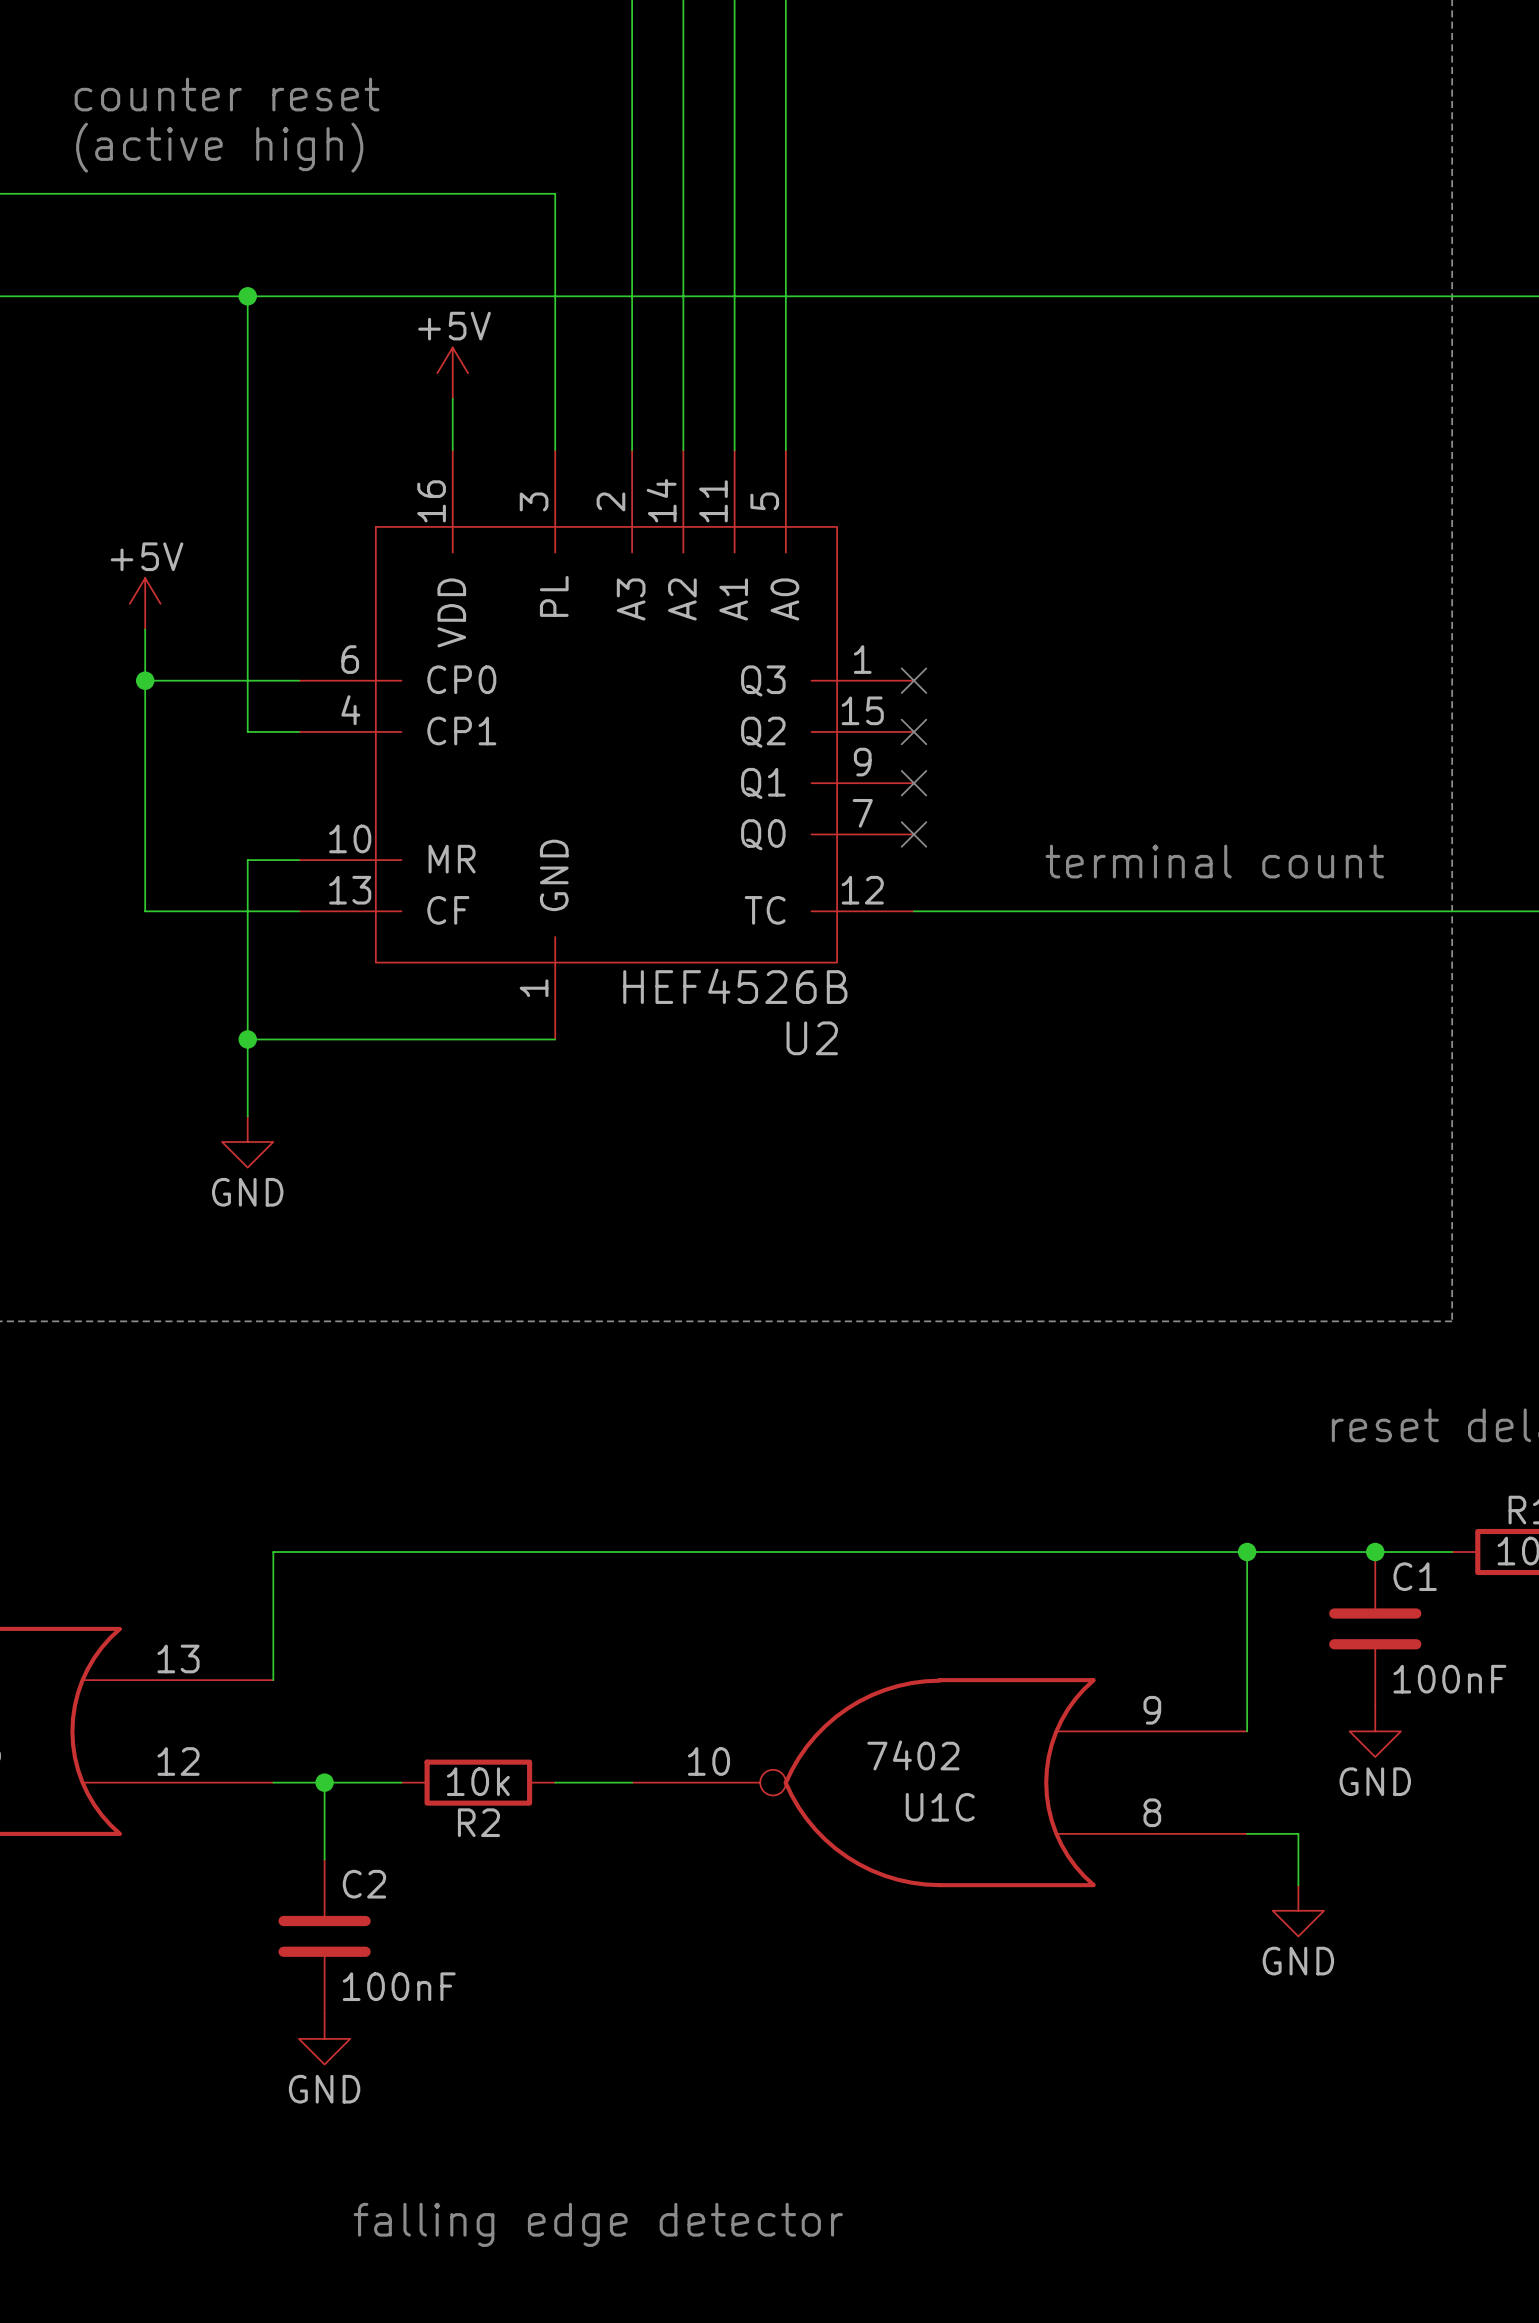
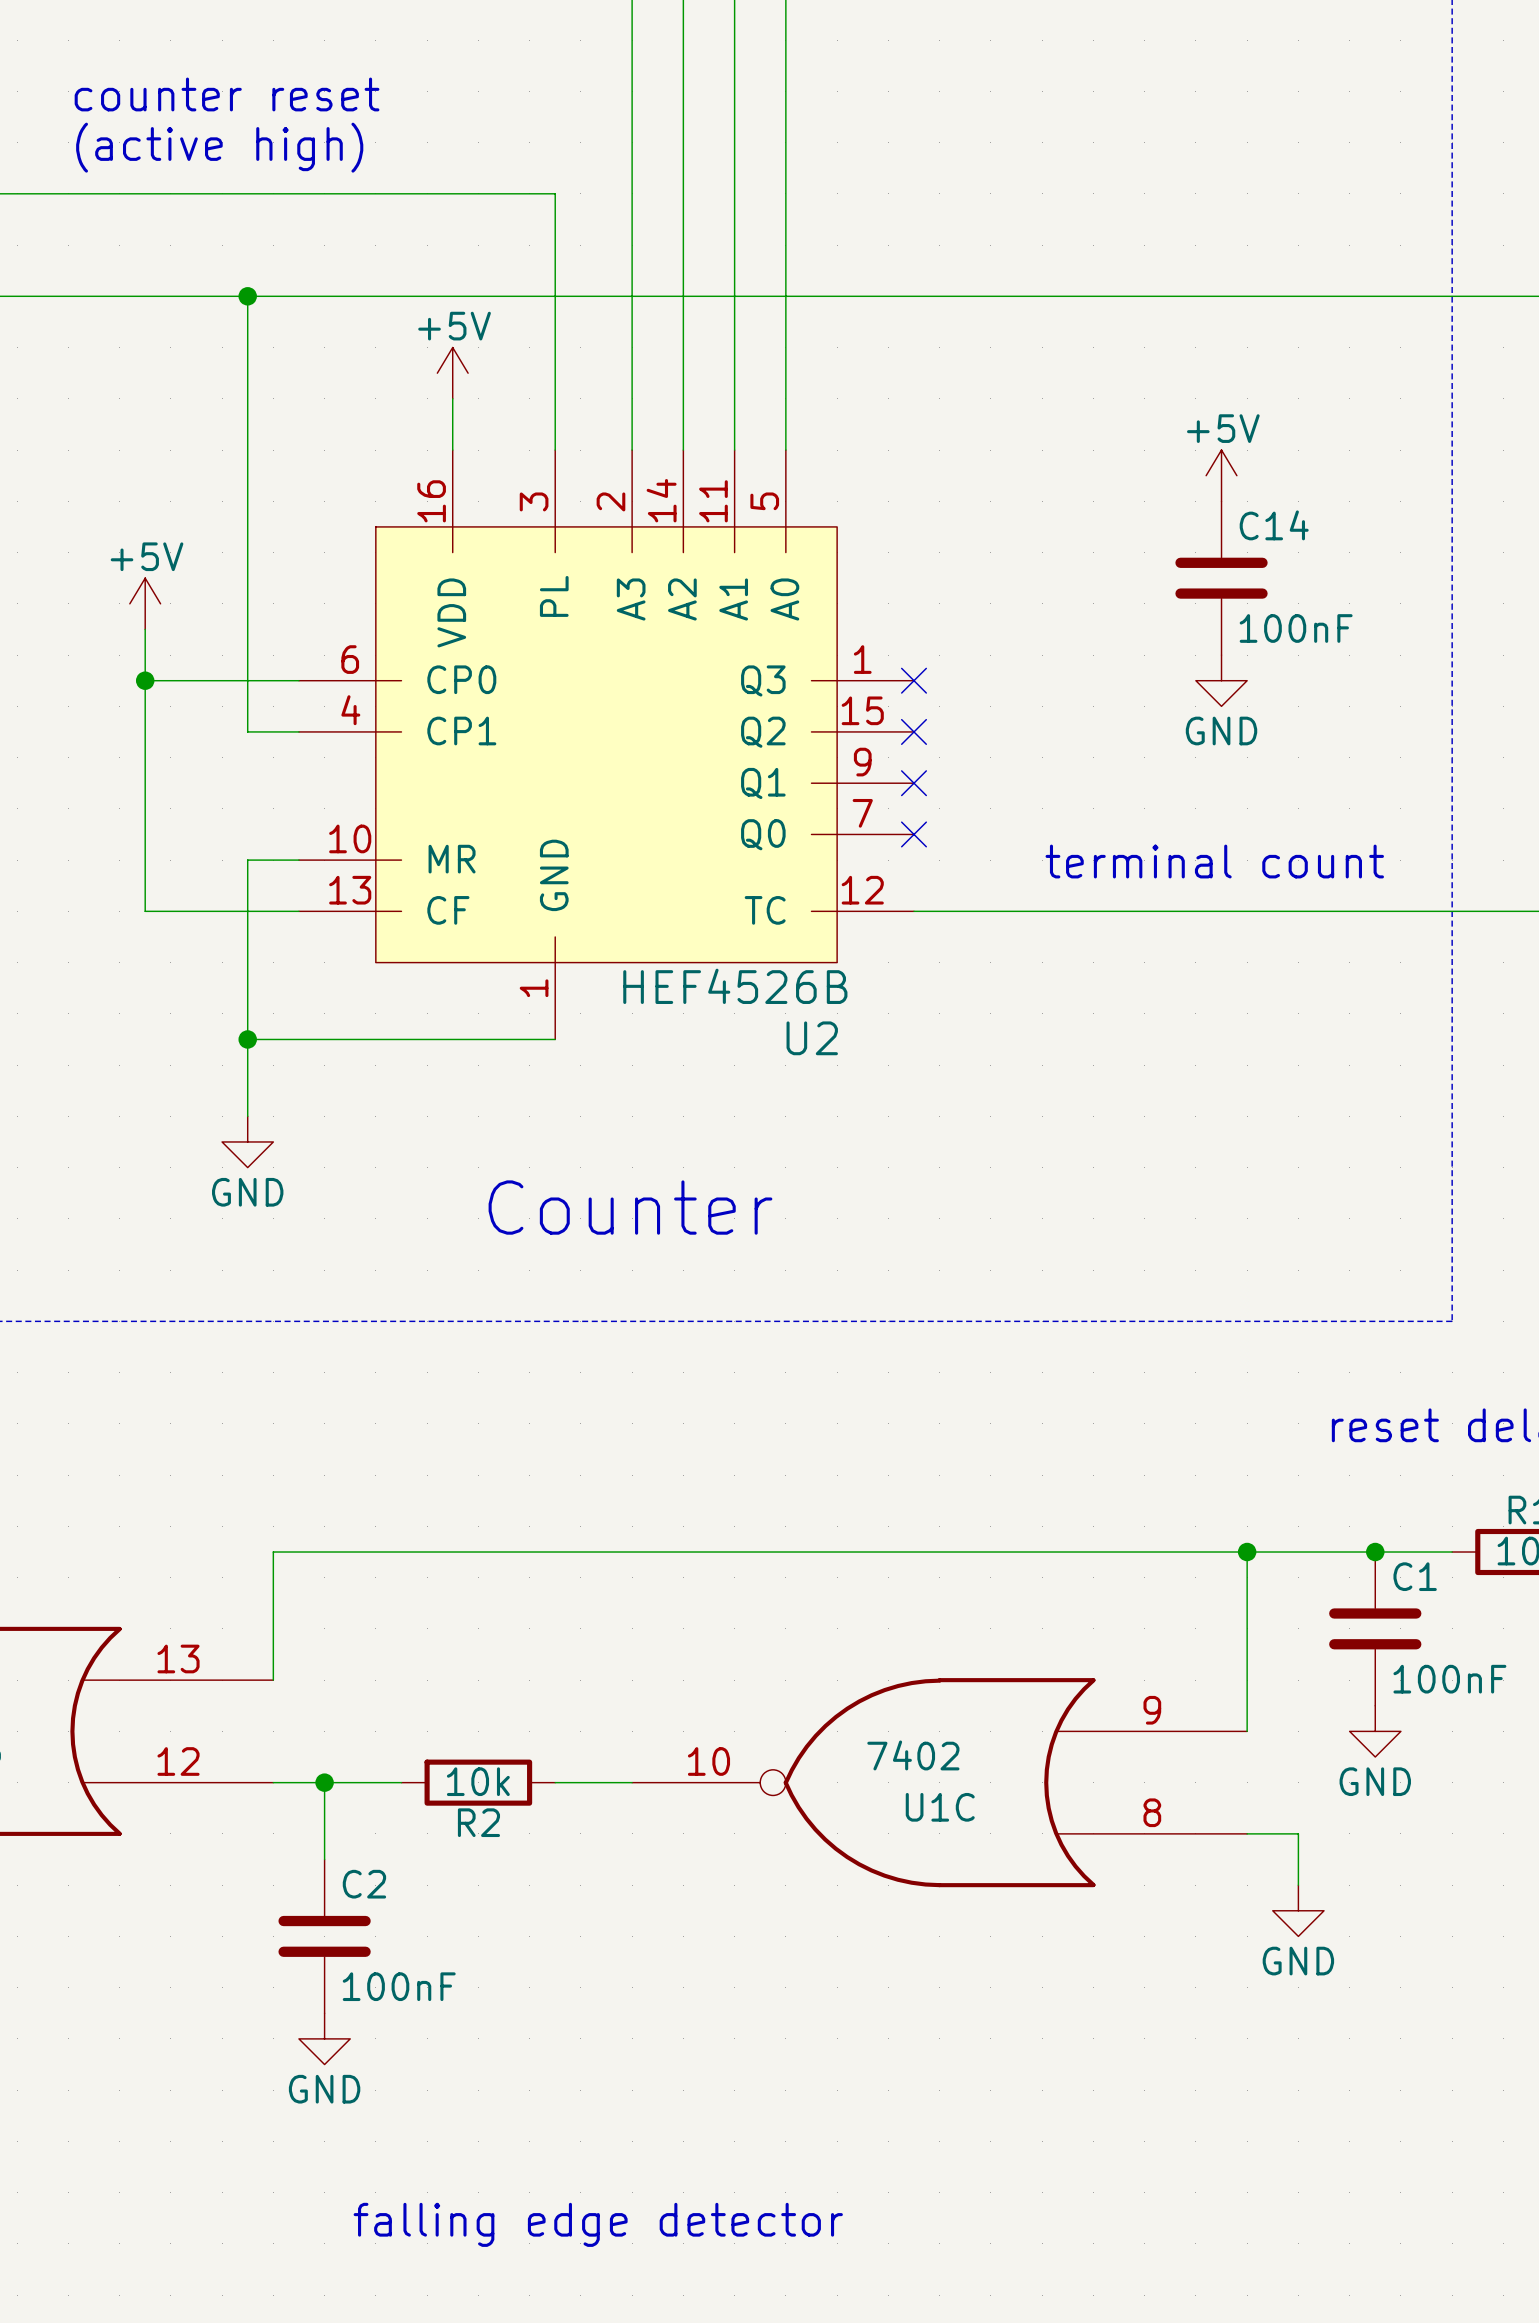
power symbol: none -> +5V (1221, 475)
C14: none -> 100nF (1221, 578)
power symbol: none -> GND (1221, 680)
text: none -> Counter (630, 1207)

